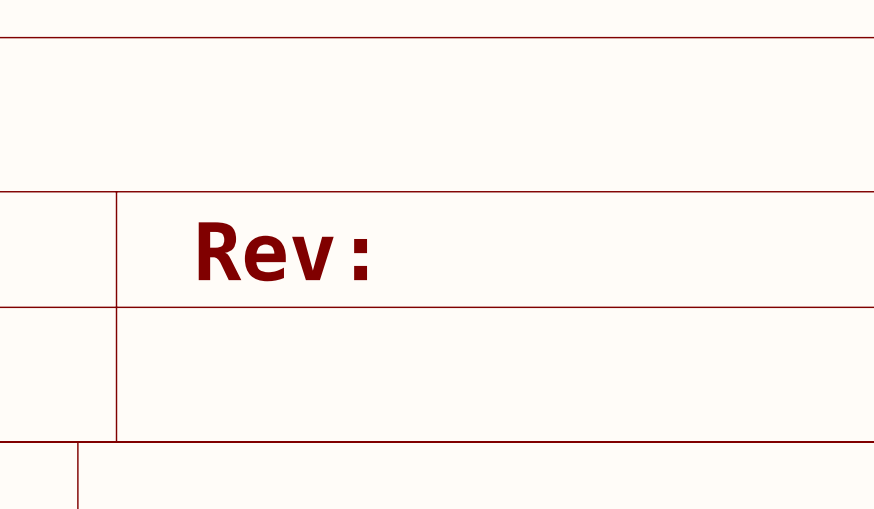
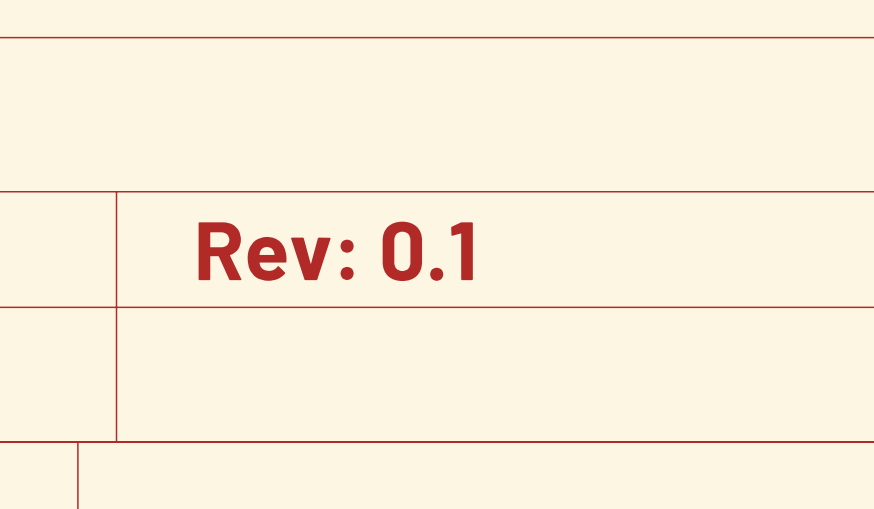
title block: Rev: (282, 251) -> Rev: 0.1 (335, 251)

